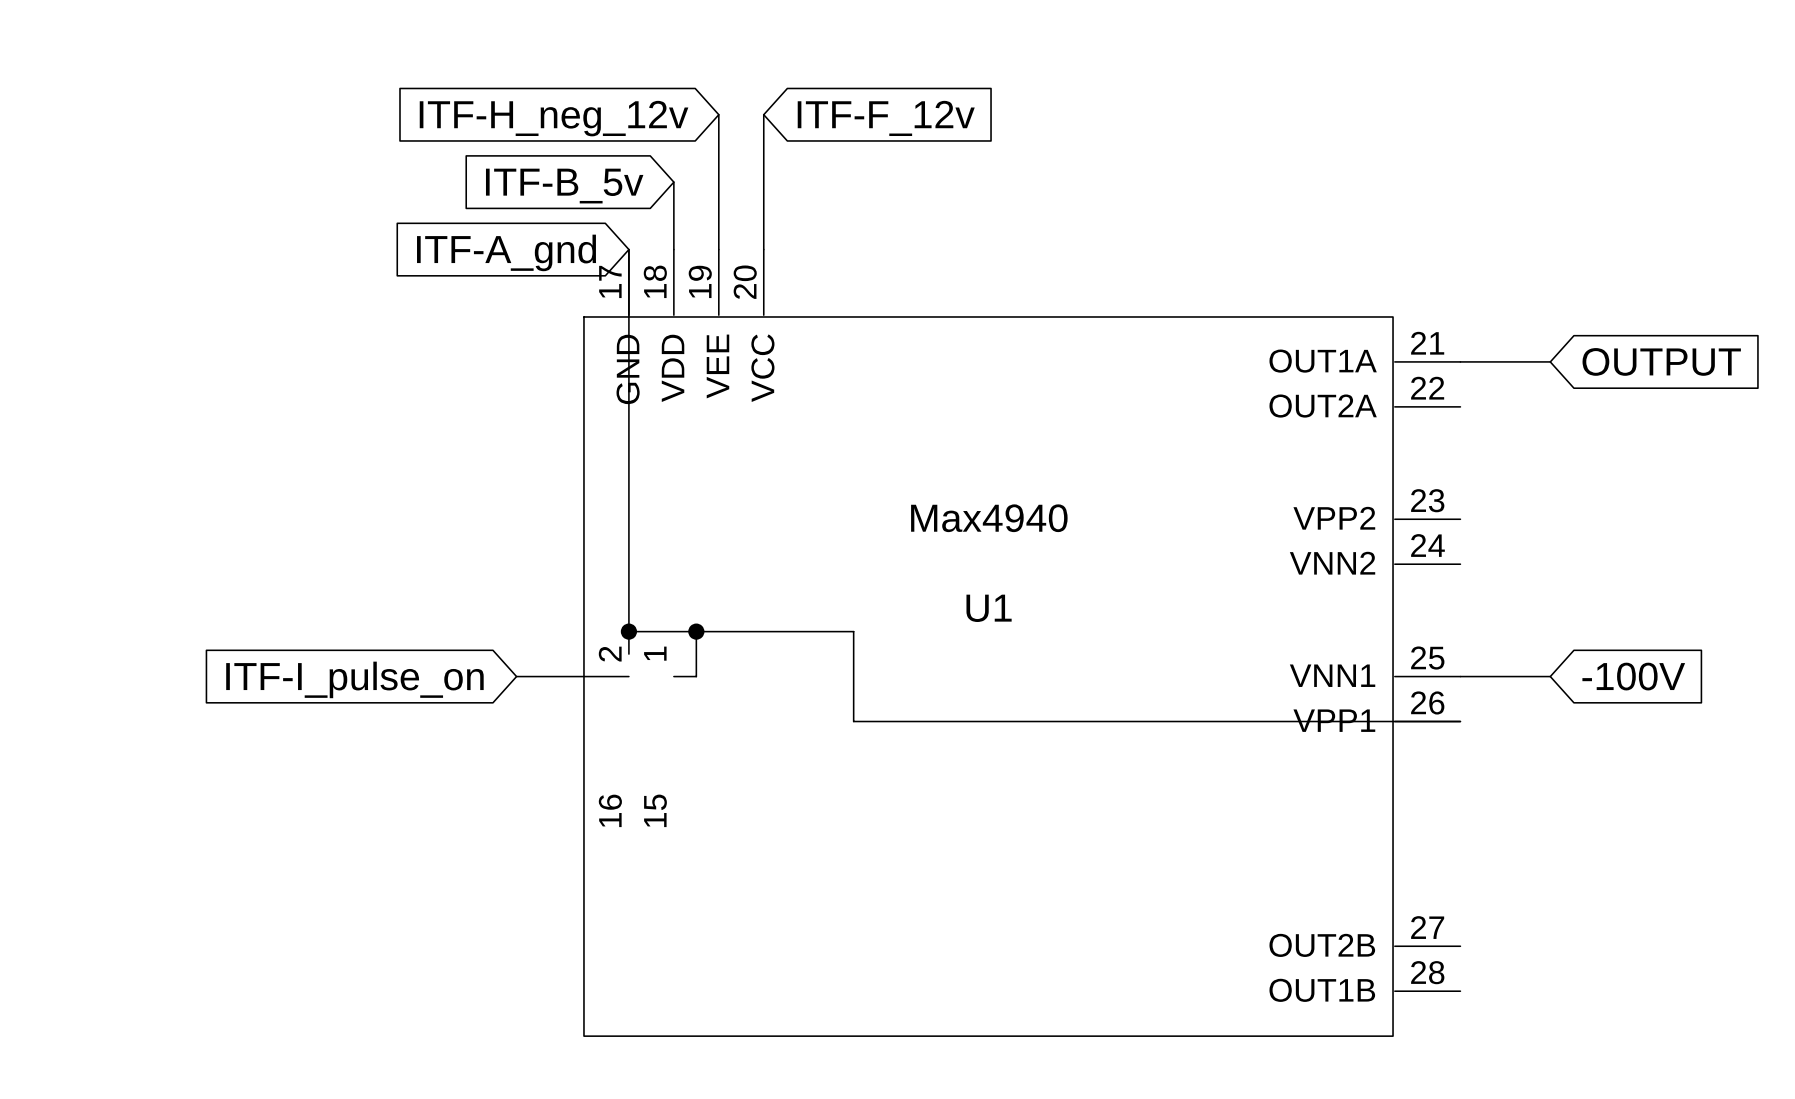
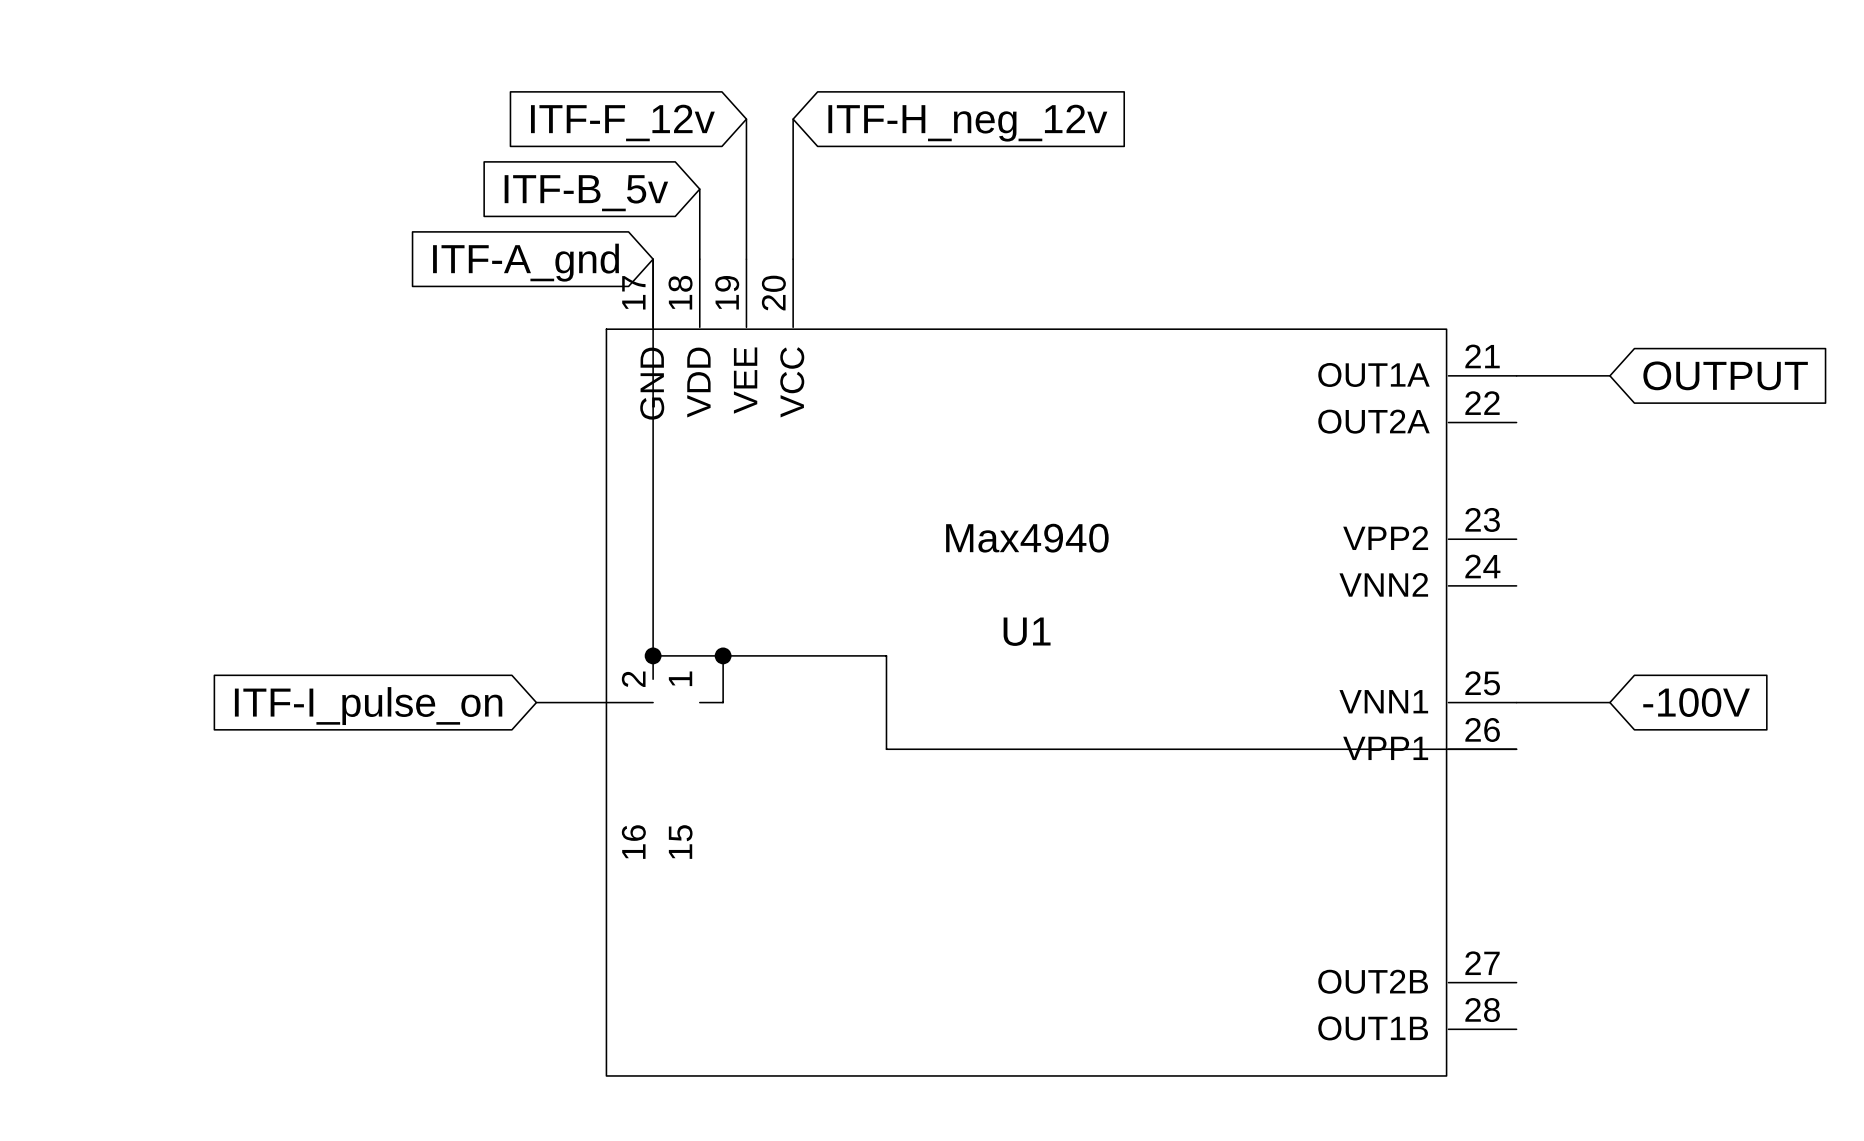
global label: ITF-H_neg_12v (554, 118) -> ITF-F_12v (622, 122)
global label: ITF-F_12v (886, 118) -> ITF-H_neg_12v (967, 123)

